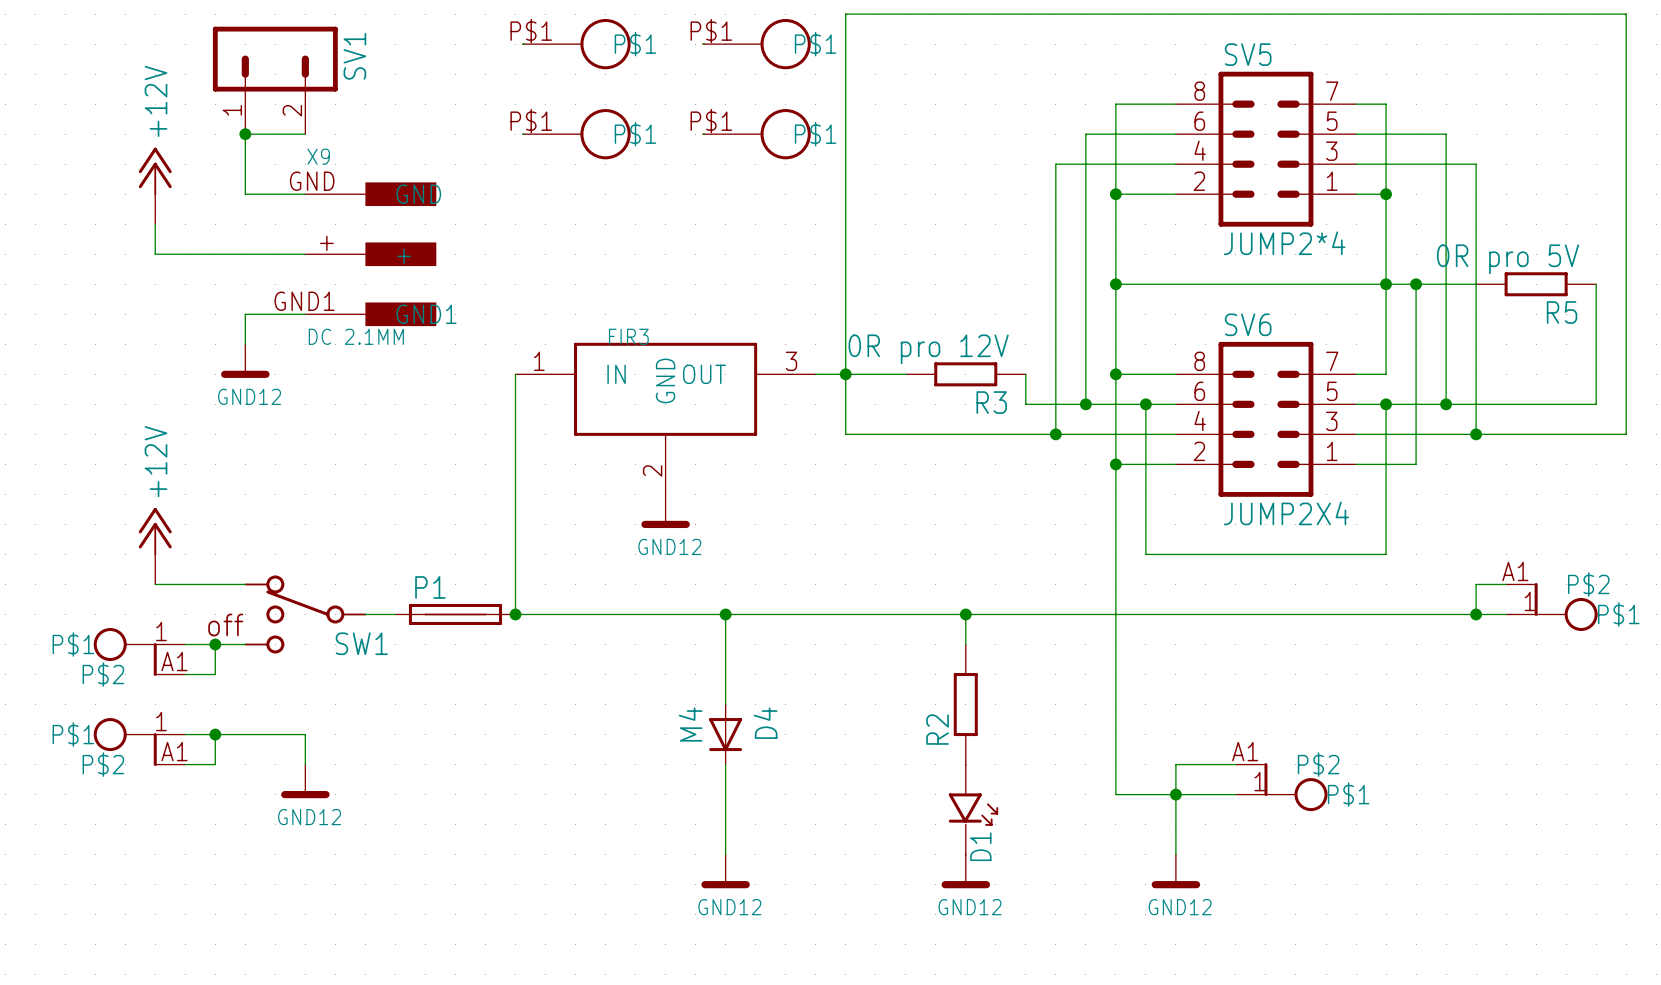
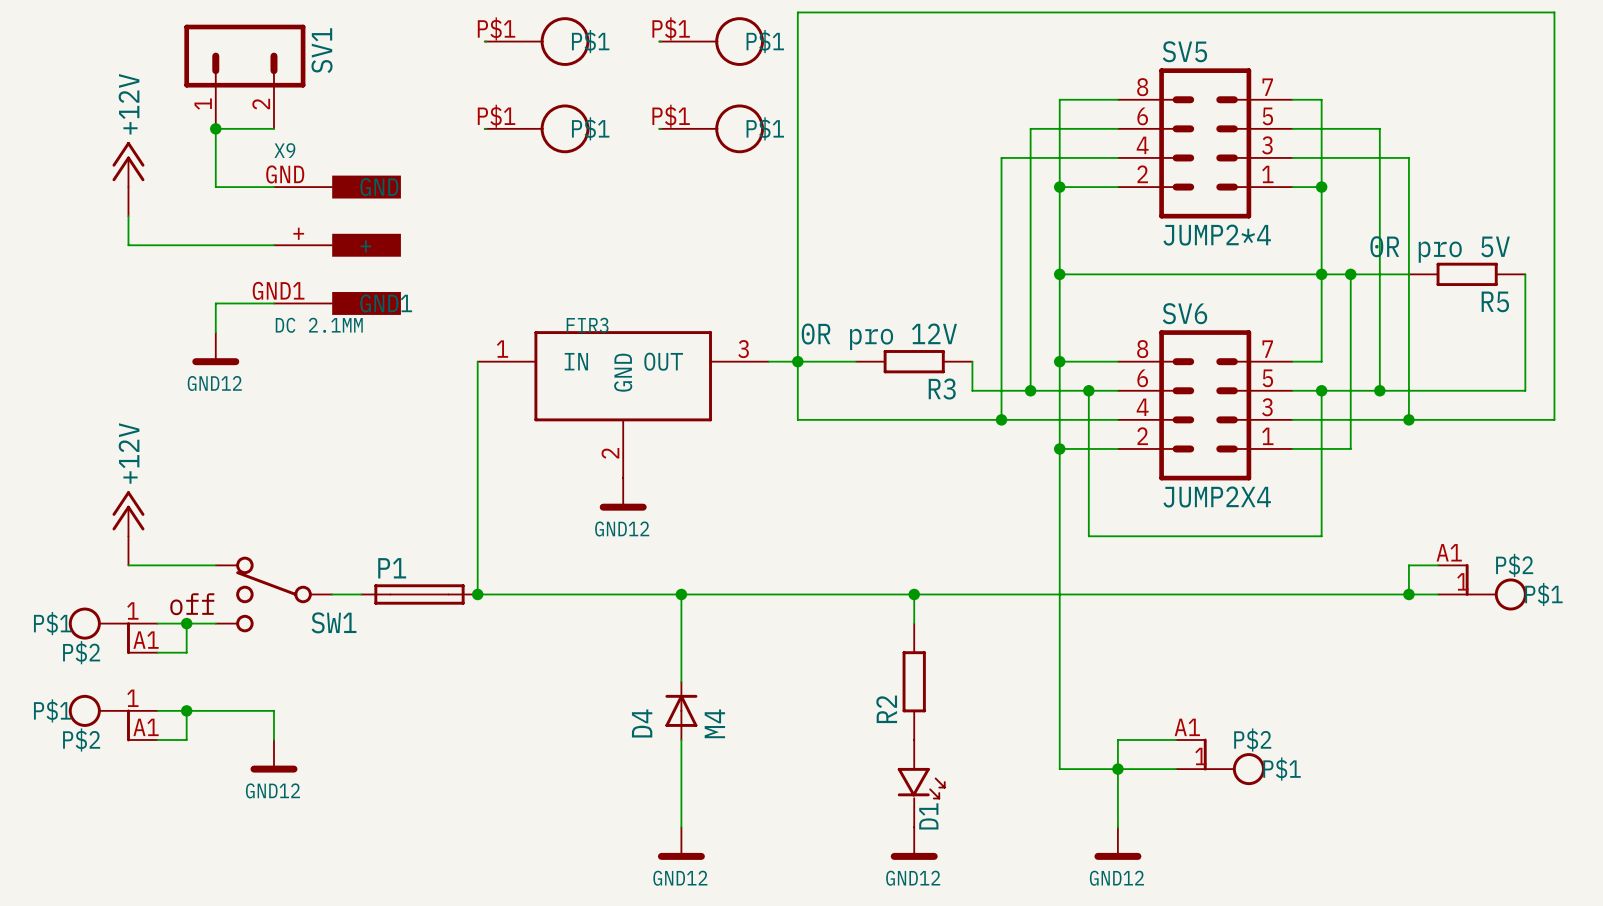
D4 rotation: 0° (725, 734) -> 180° (681, 710)

